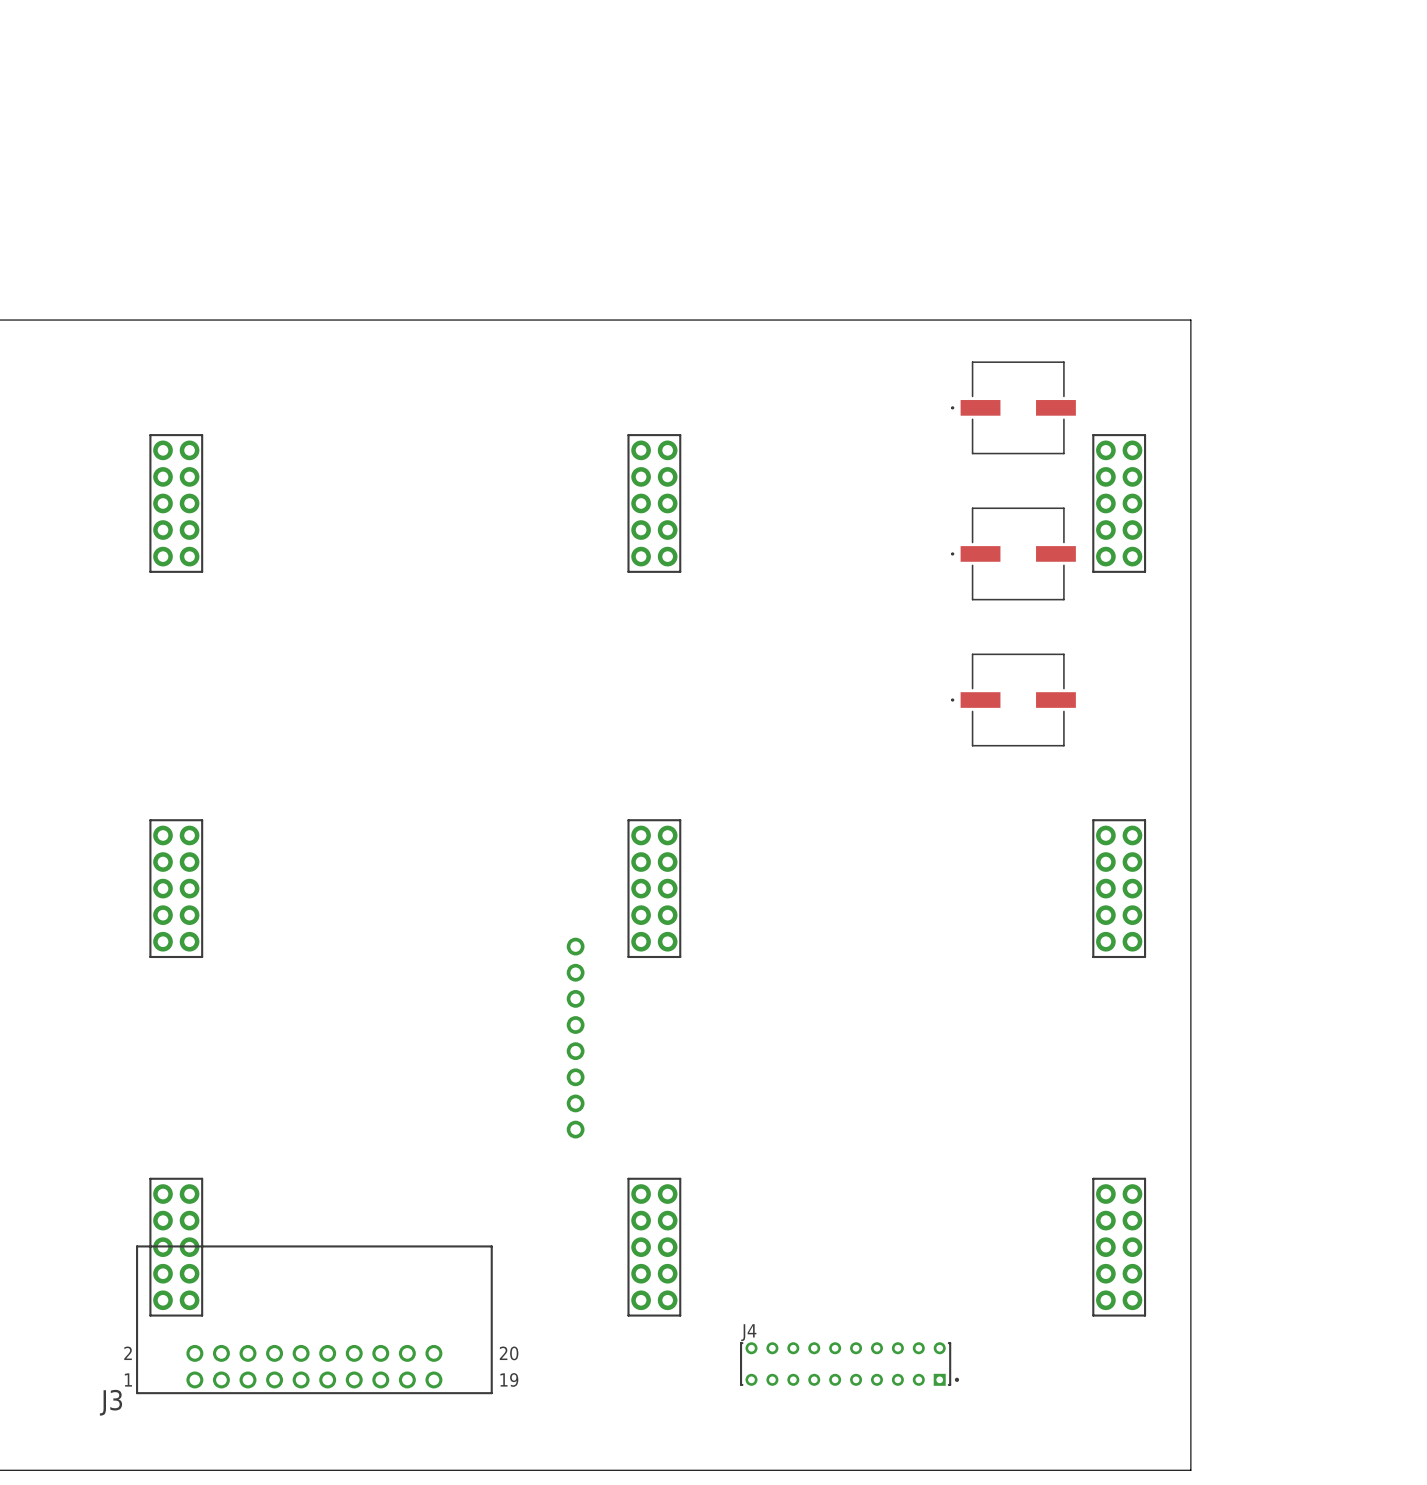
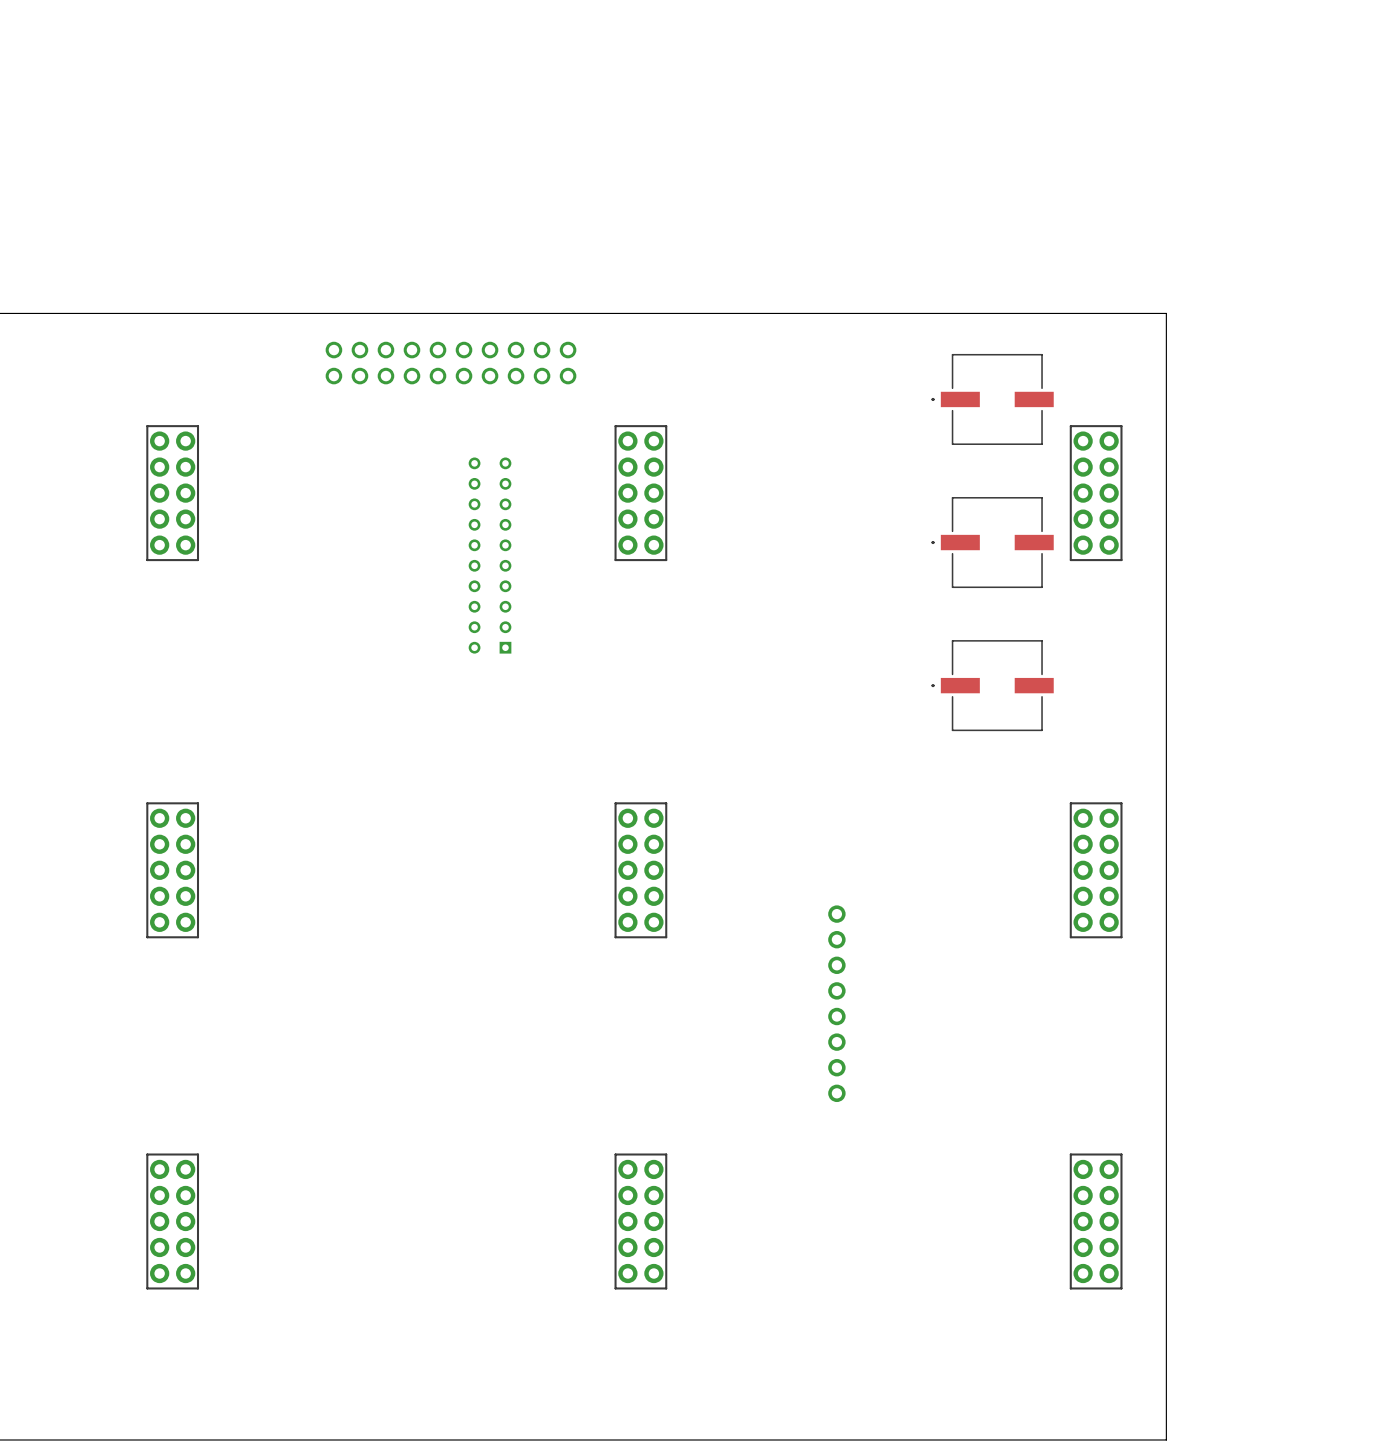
part: none -> (451, 363)
part: none -> (490, 555)
part: none -> (836, 1003)
part: (575, 1038) -> none
J3: (314, 1319) -> none
J4: (849, 1364) -> none

